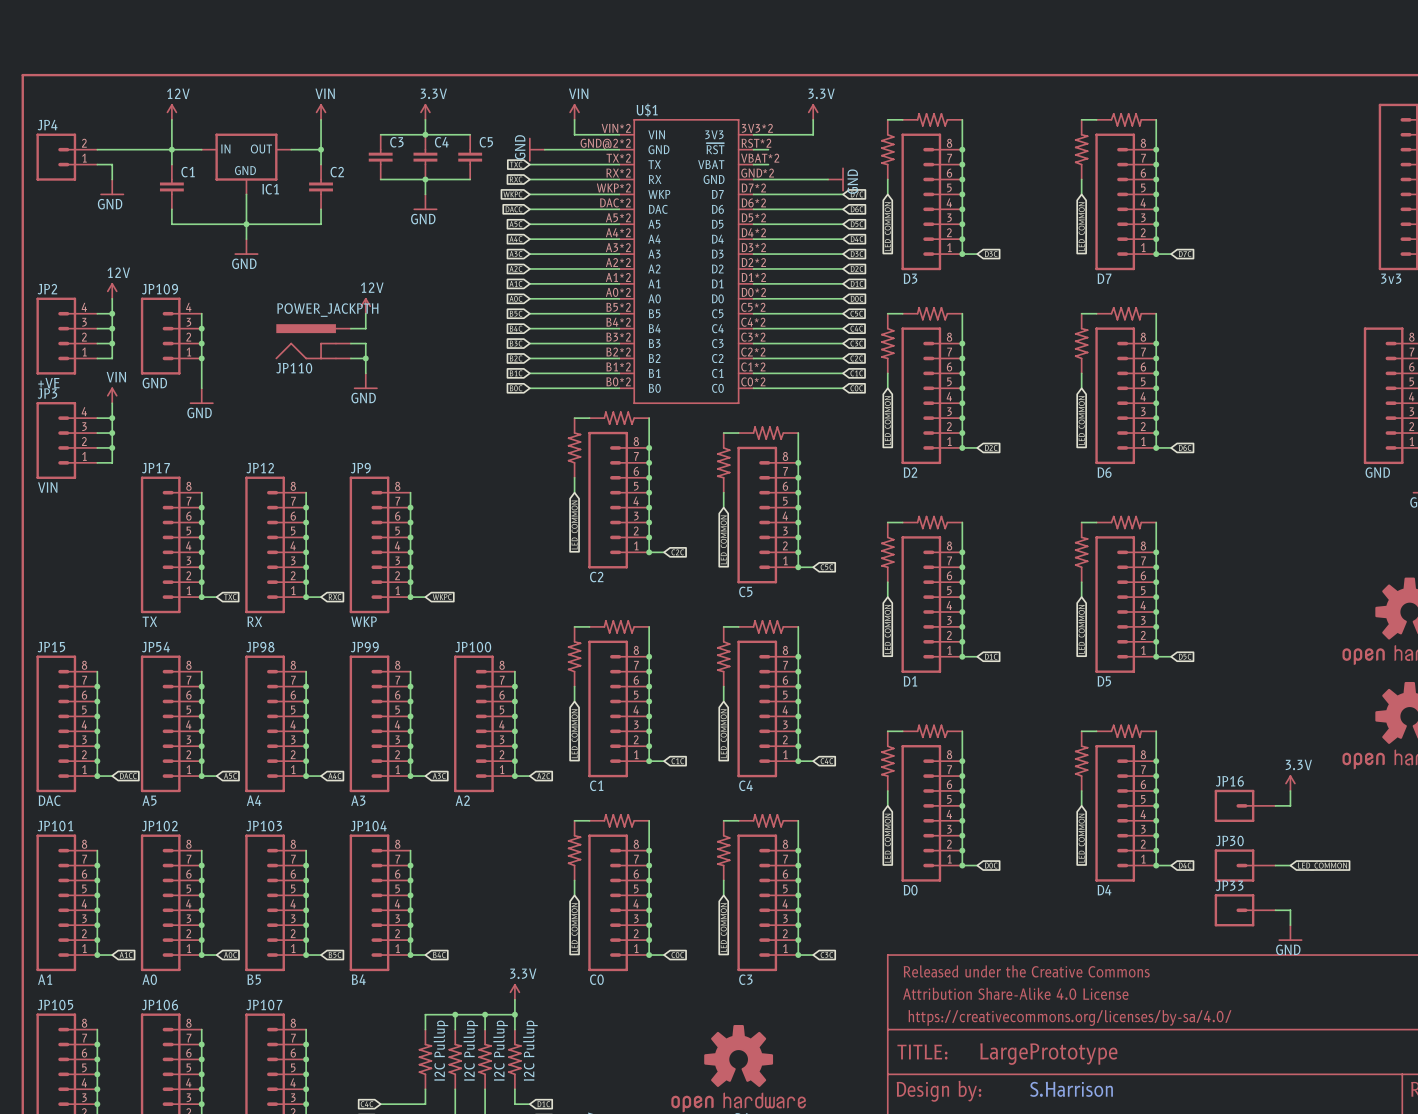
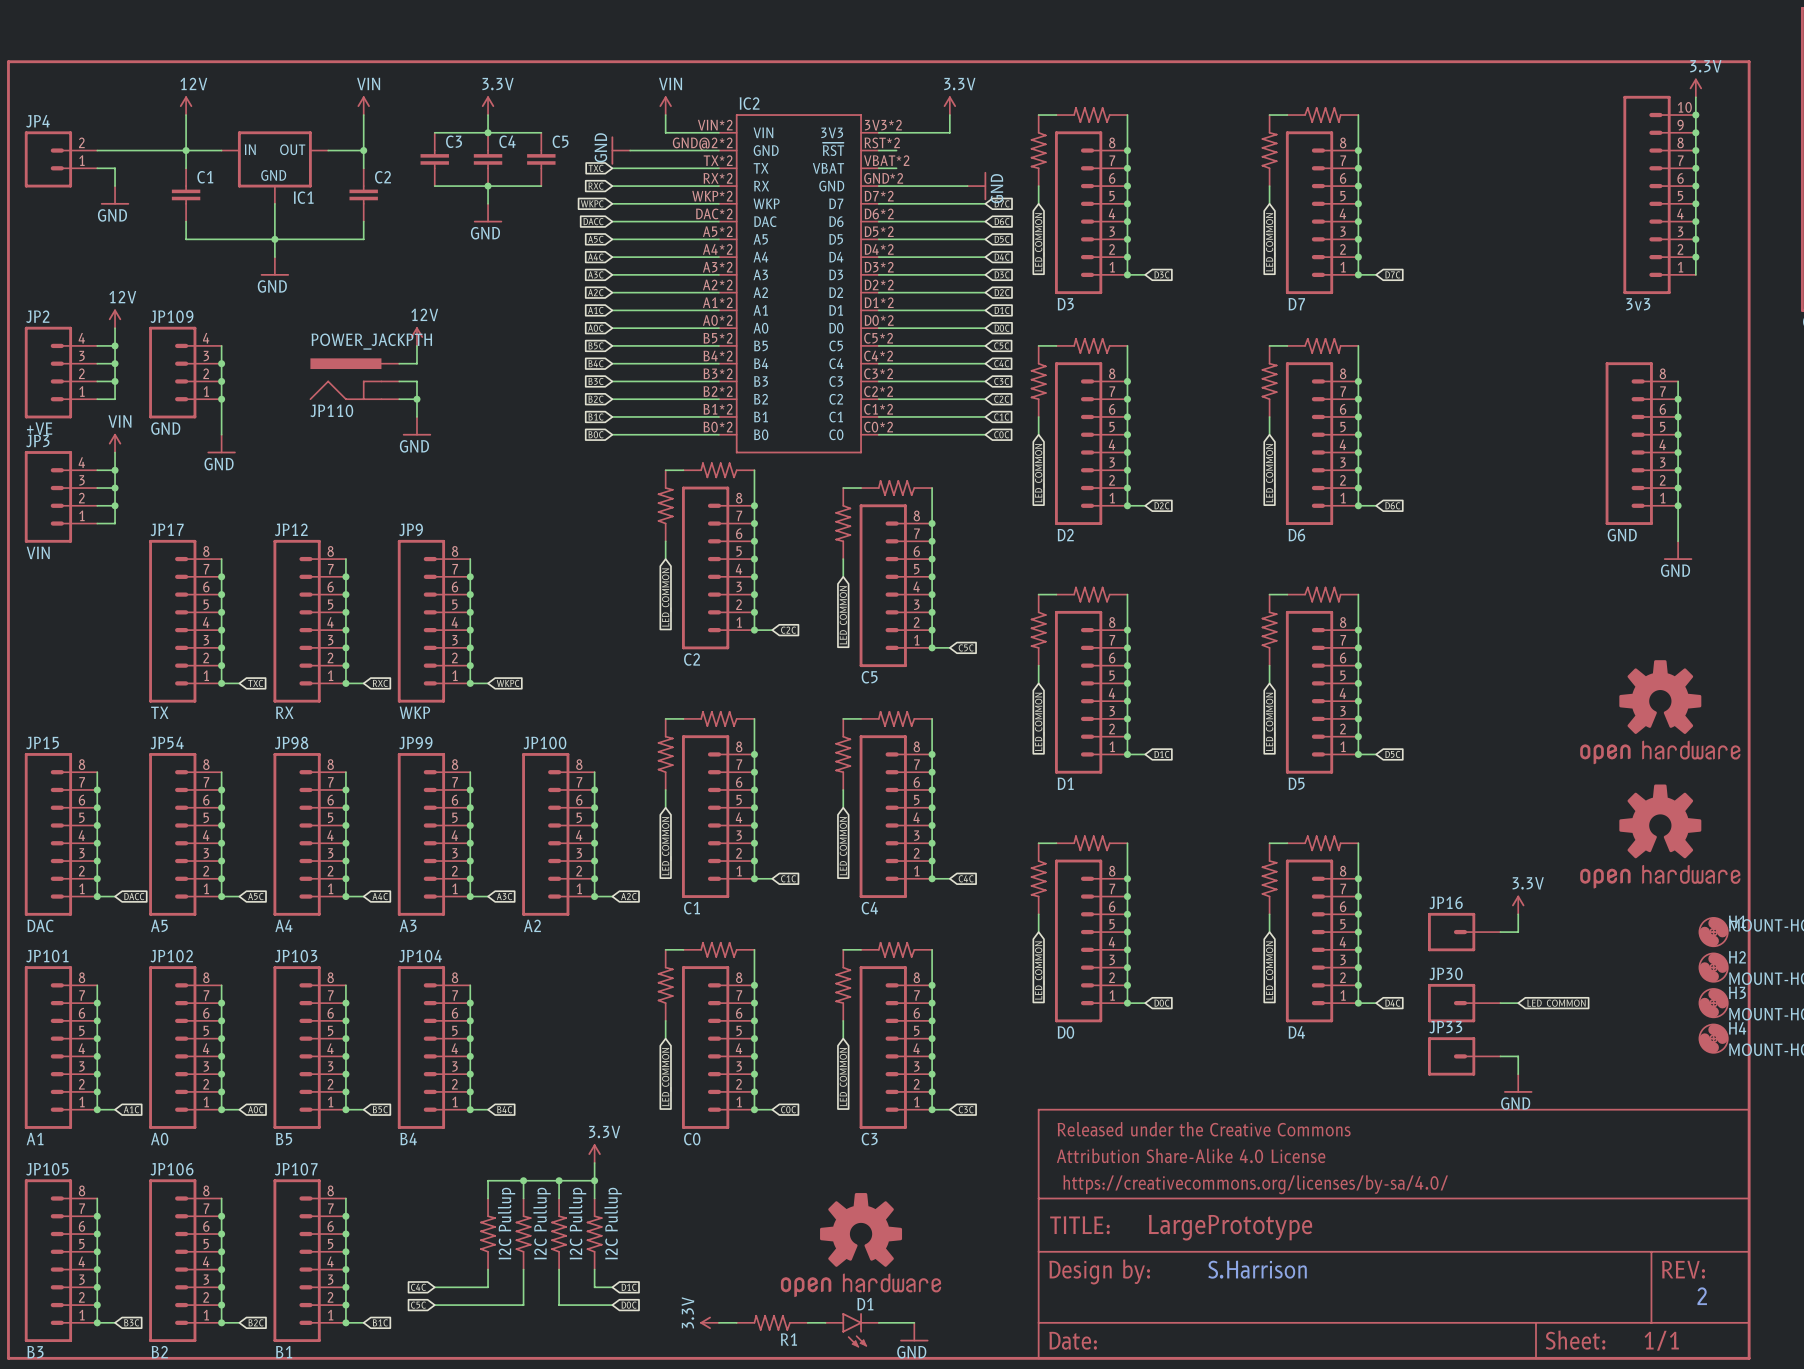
U$1 name: U$1 (647, 110) -> IC2 (749, 103)

